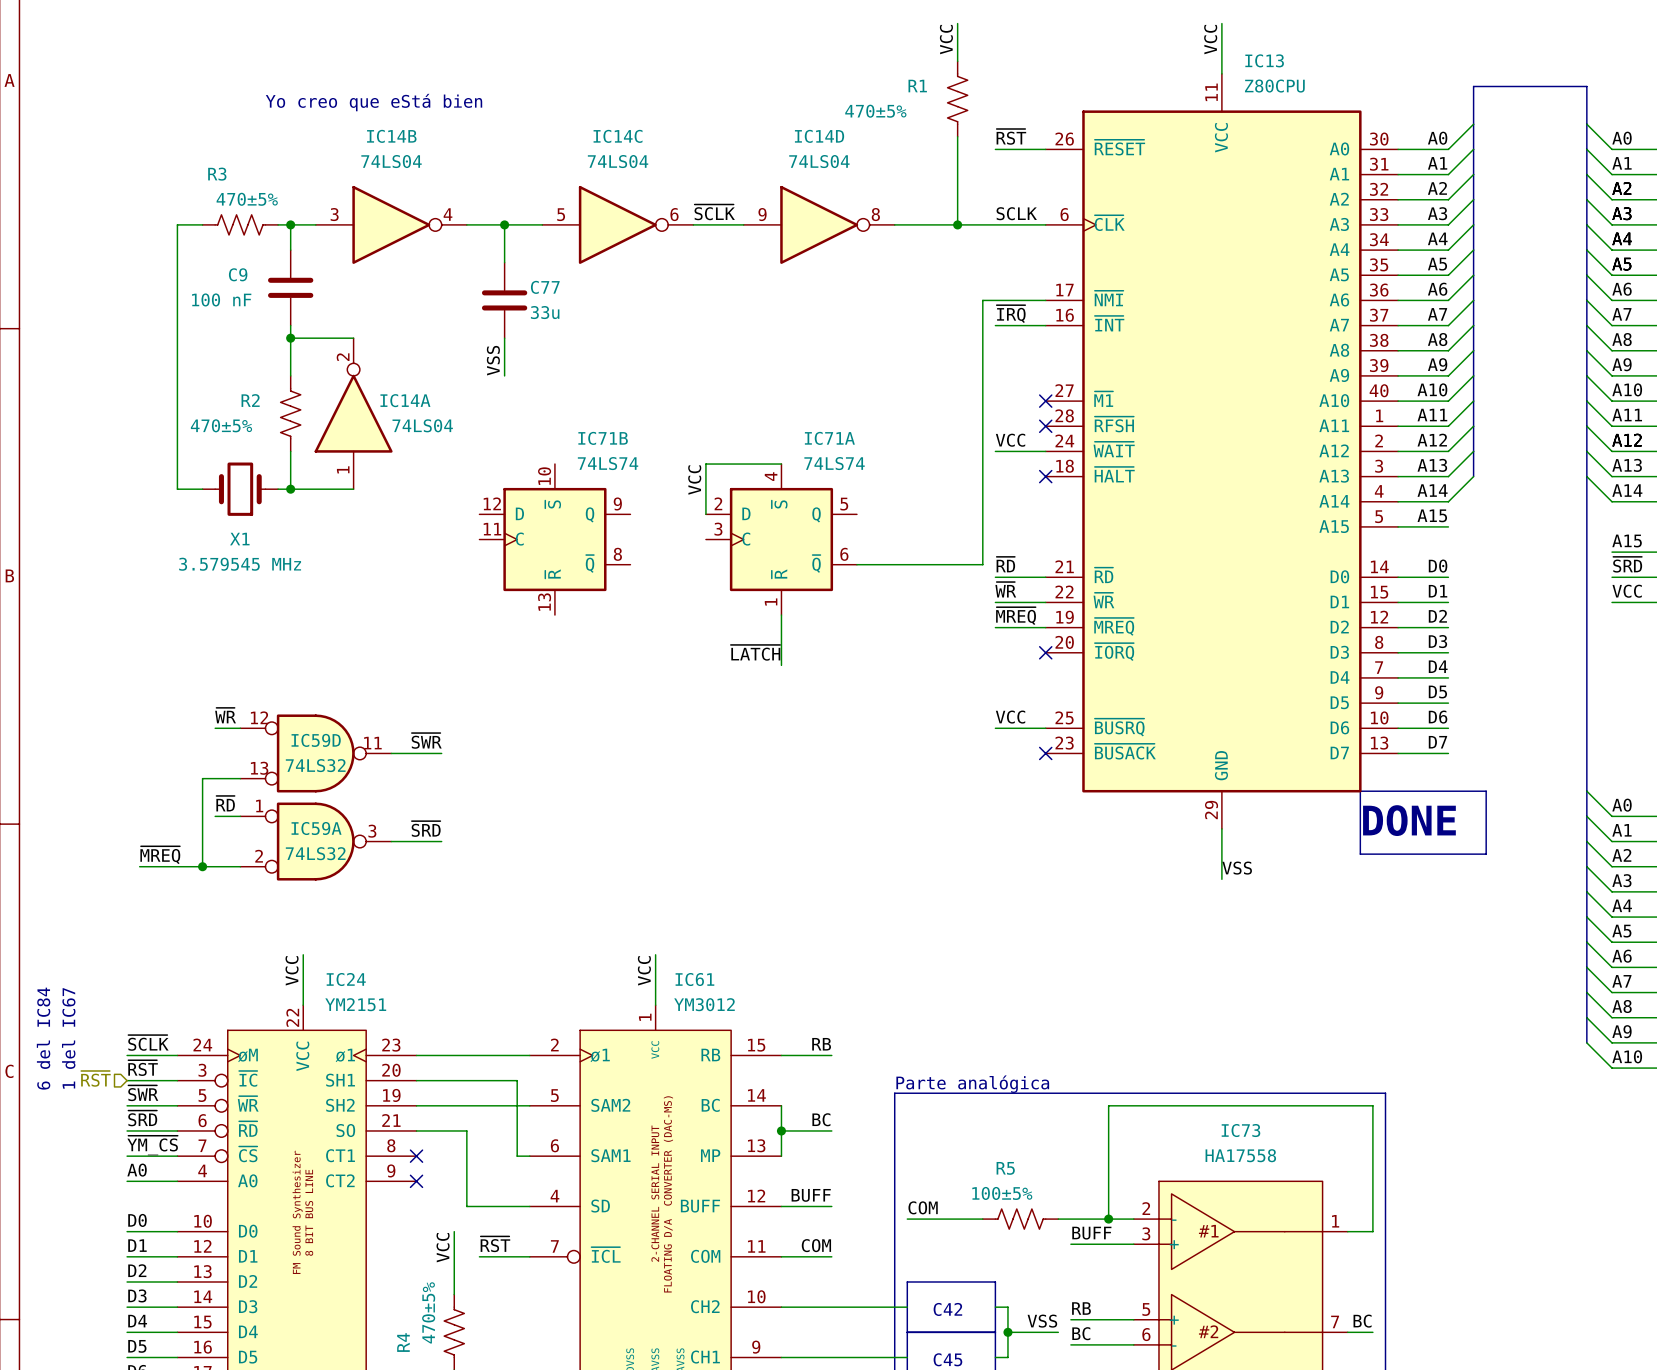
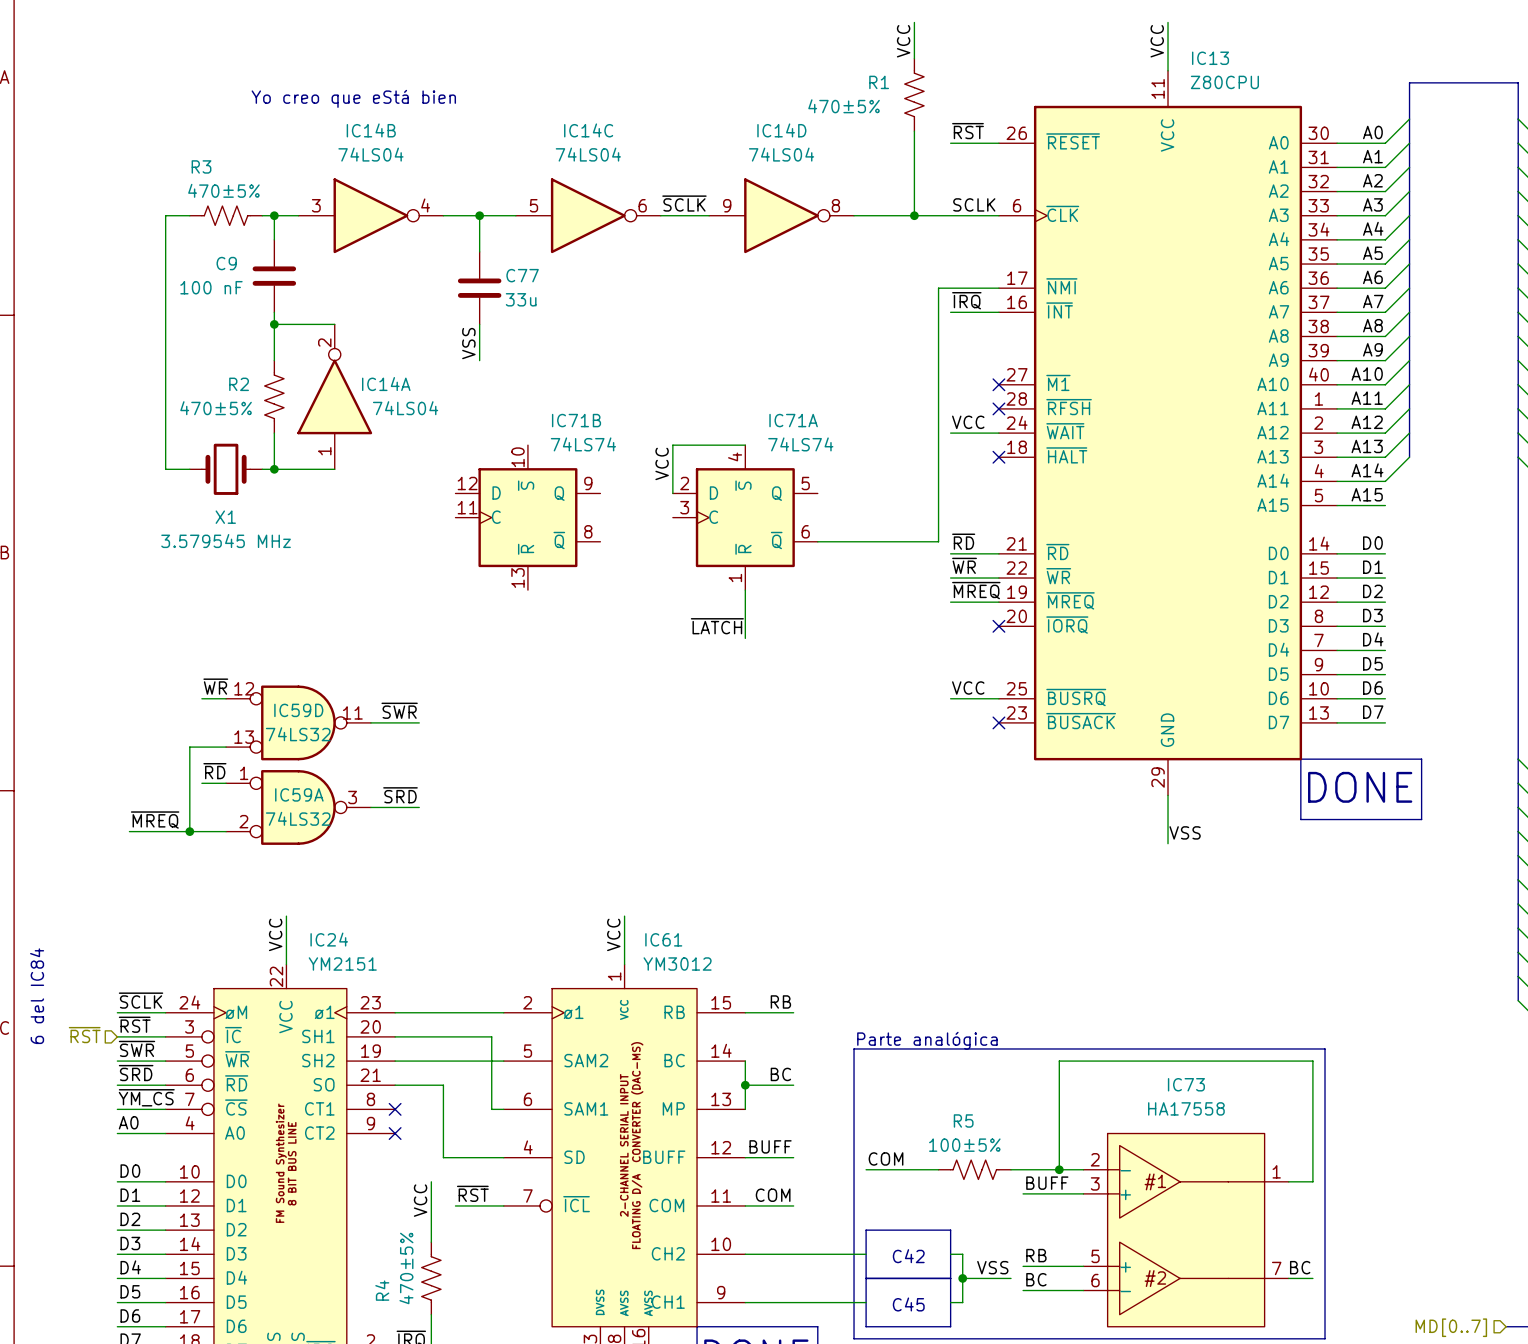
text: 1 del IC67 (68, 1038) -> none

